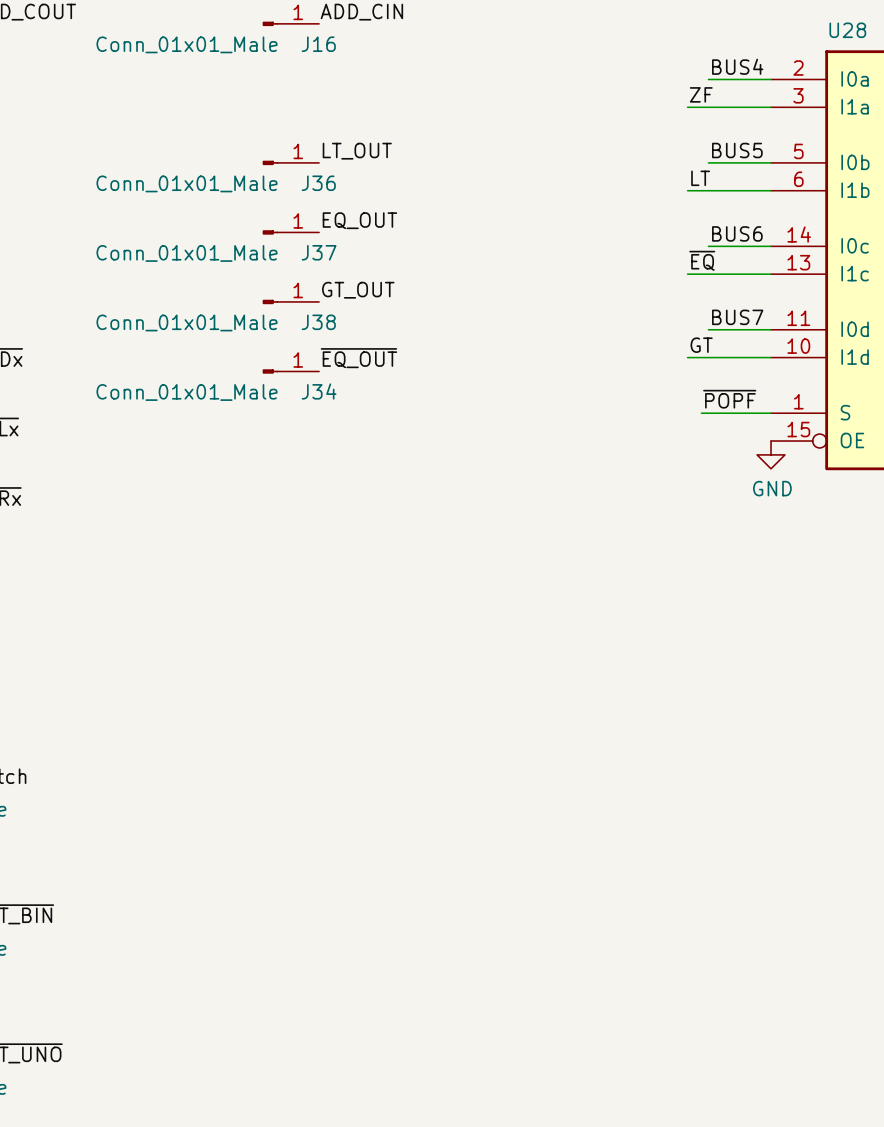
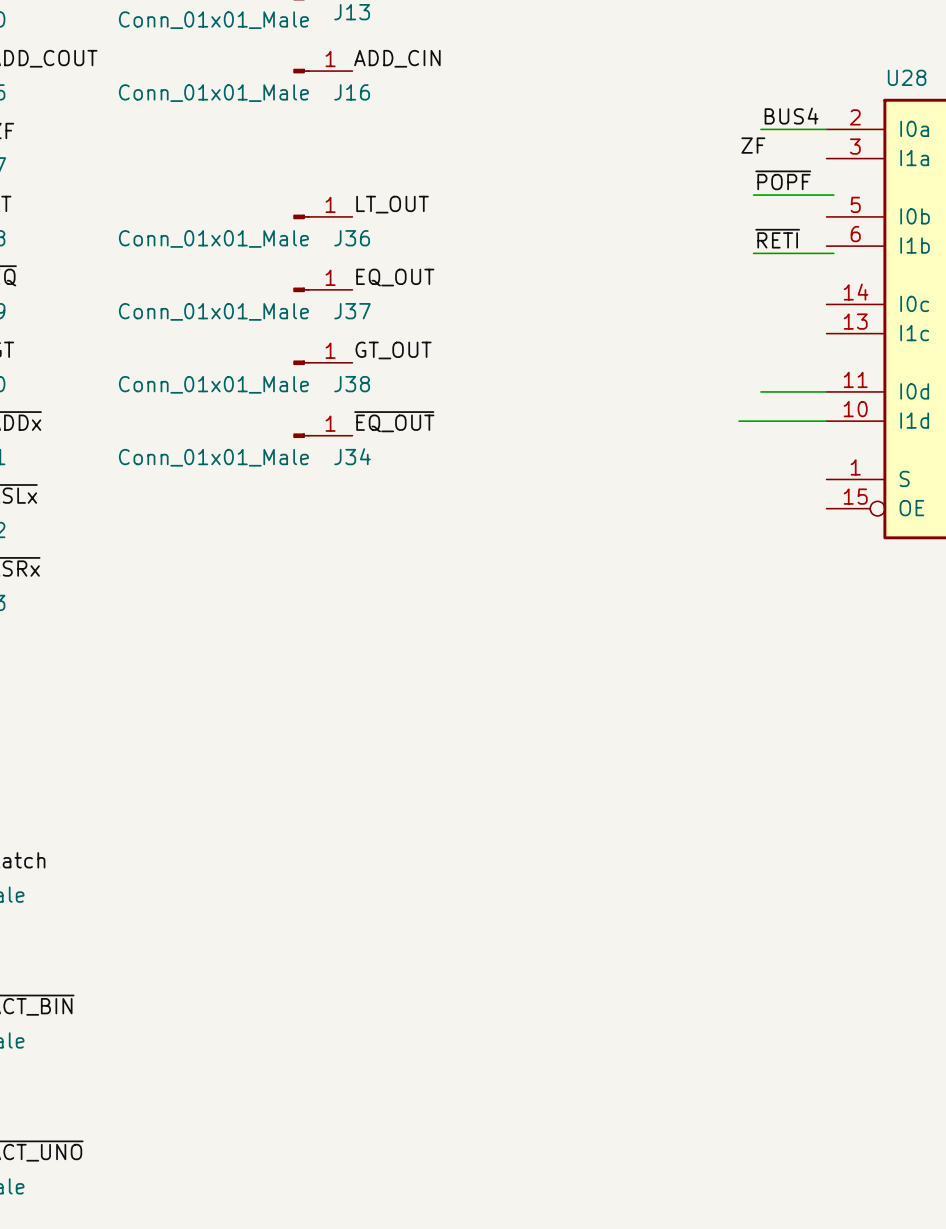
wire: (687, 107) (771, 107) -> none
label: none -> ~{POPF} (783, 180)
wire: none -> (753, 195) (833, 195)
label: BUS5 (737, 150) -> none
wire: (708, 162) (771, 162) -> none
label: LT (700, 178) -> none
label: none -> ~{RETI} (777, 238)
wire: (687, 190) (771, 190) -> none
wire: none -> (753, 253) (833, 253)
label: BUS6 (737, 233) -> none
wire: (708, 246) (771, 246) -> none
label: ~{EQ} (702, 260) -> none
wire: (687, 274) (771, 274) -> none
label: BUS7 (737, 317) -> none
label: GT (701, 345) -> none
label: ~{POPF} (729, 399) -> none
wire: (701, 413) (771, 413) -> none
power symbol: GND (771, 454) -> none

